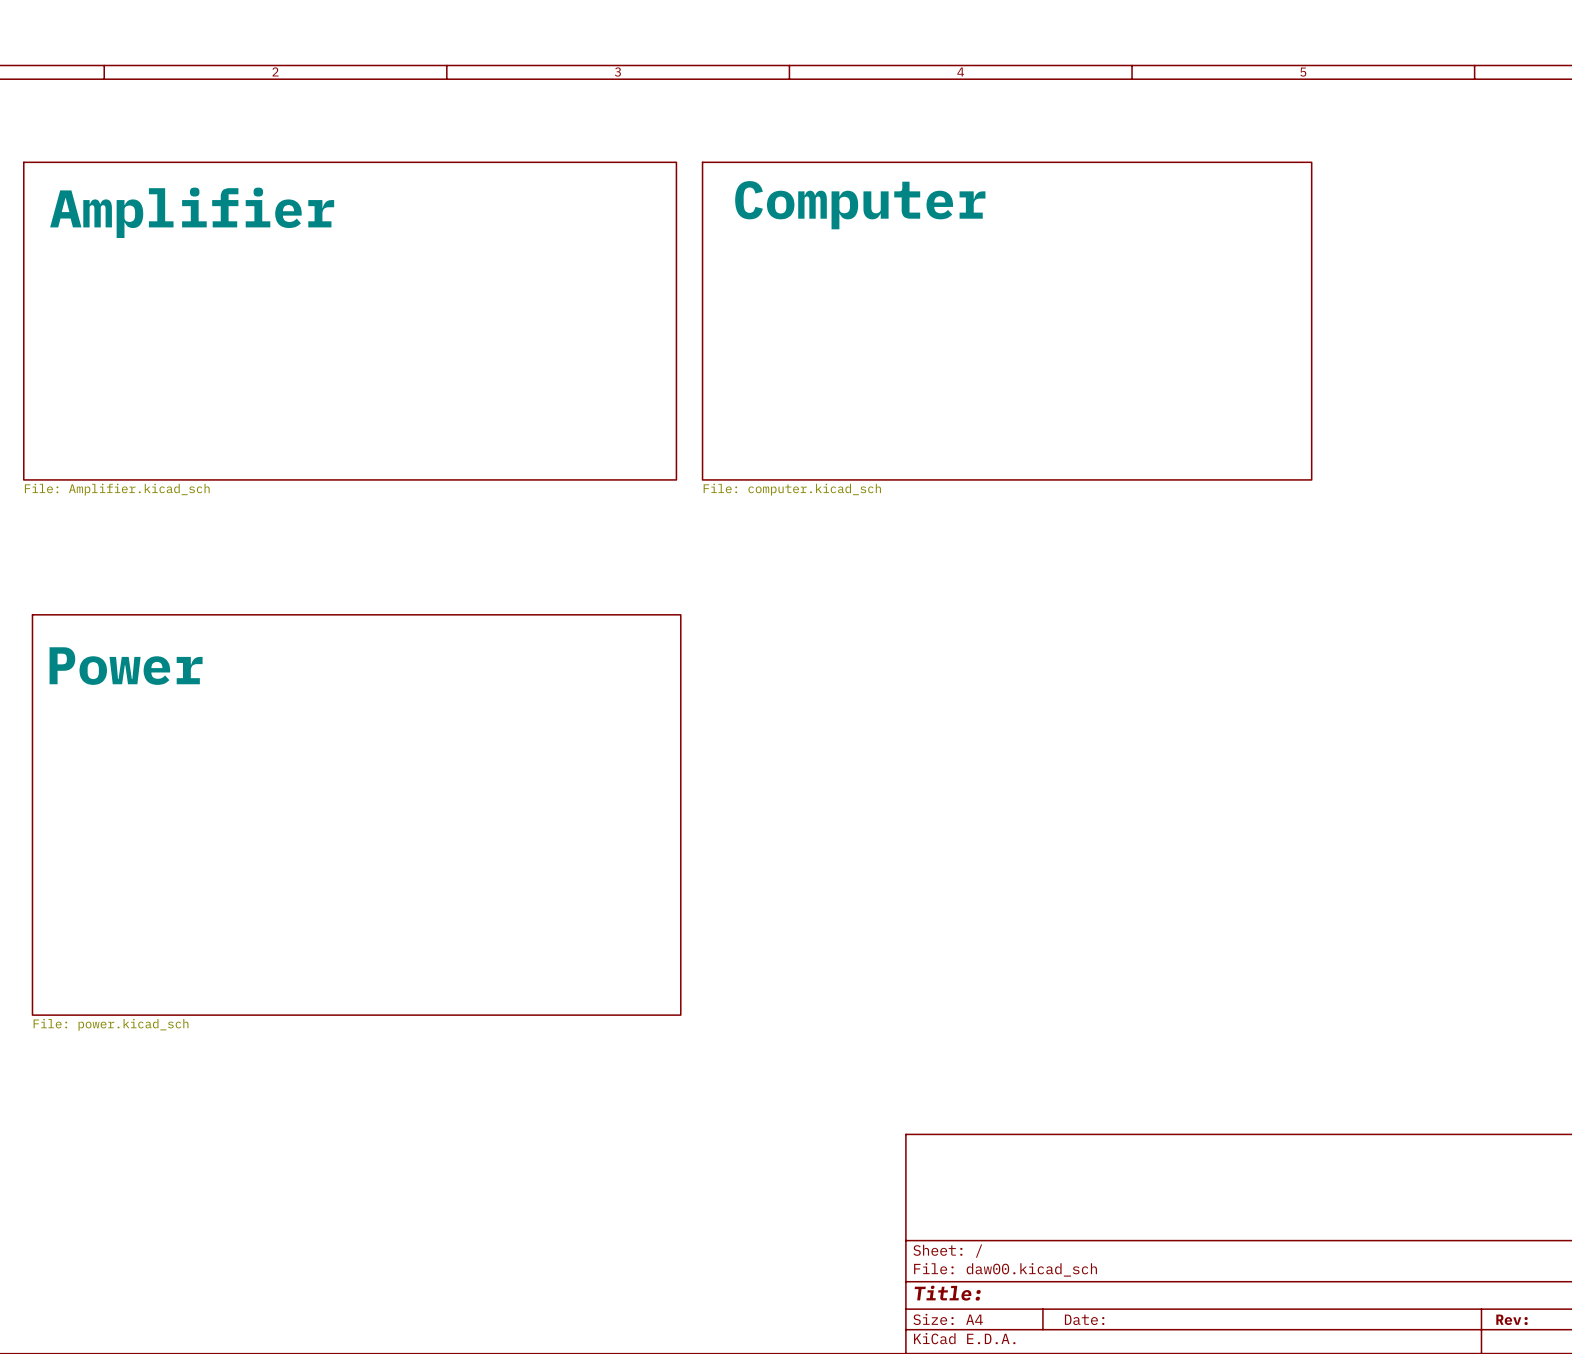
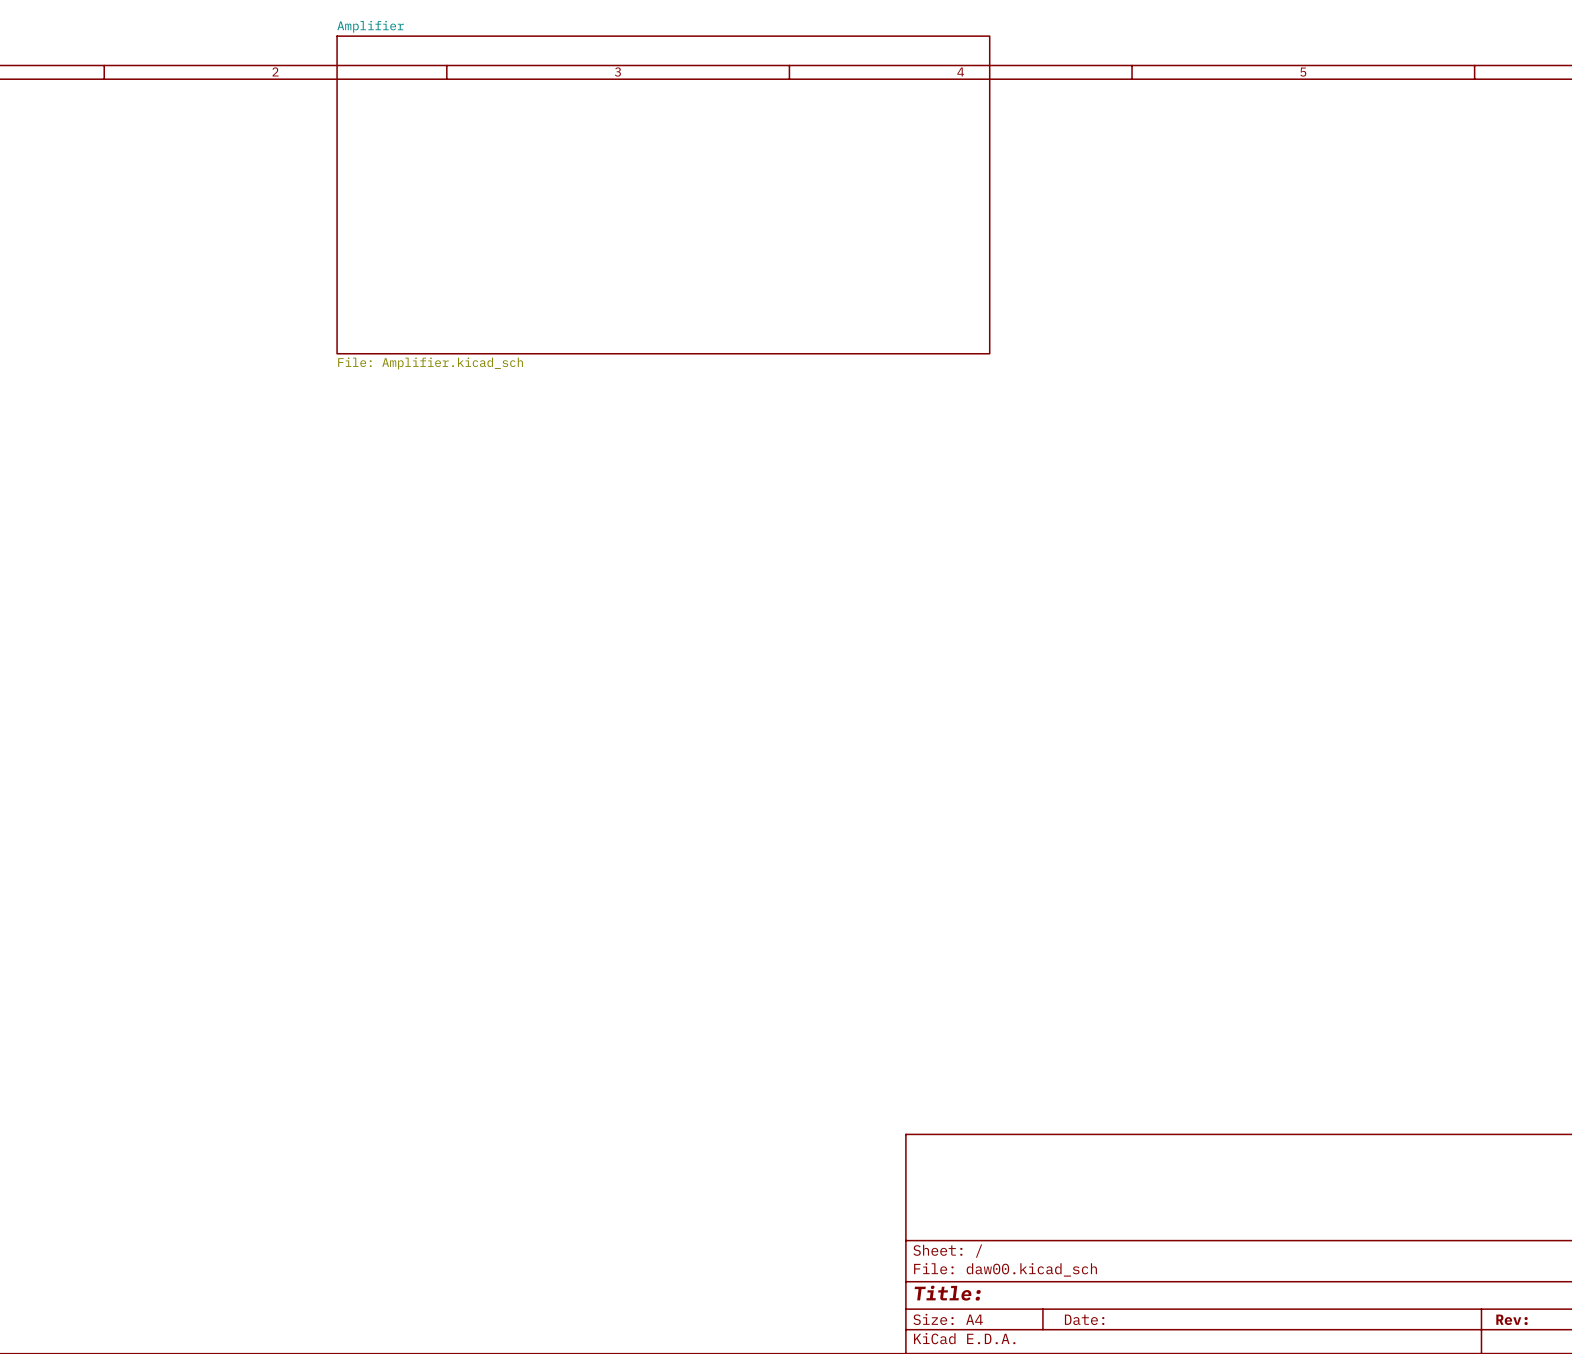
sheet Amplifier: none -> File: Amplifier.kicad_sch (663, 194)
sheet Amplifier: File: Amplifier.kicad_sch (350, 321) -> none
sheet Computer: File: computer.kicad_sch (1007, 321) -> none
sheet Power: File: power.kicad_sch (356, 814) -> none

